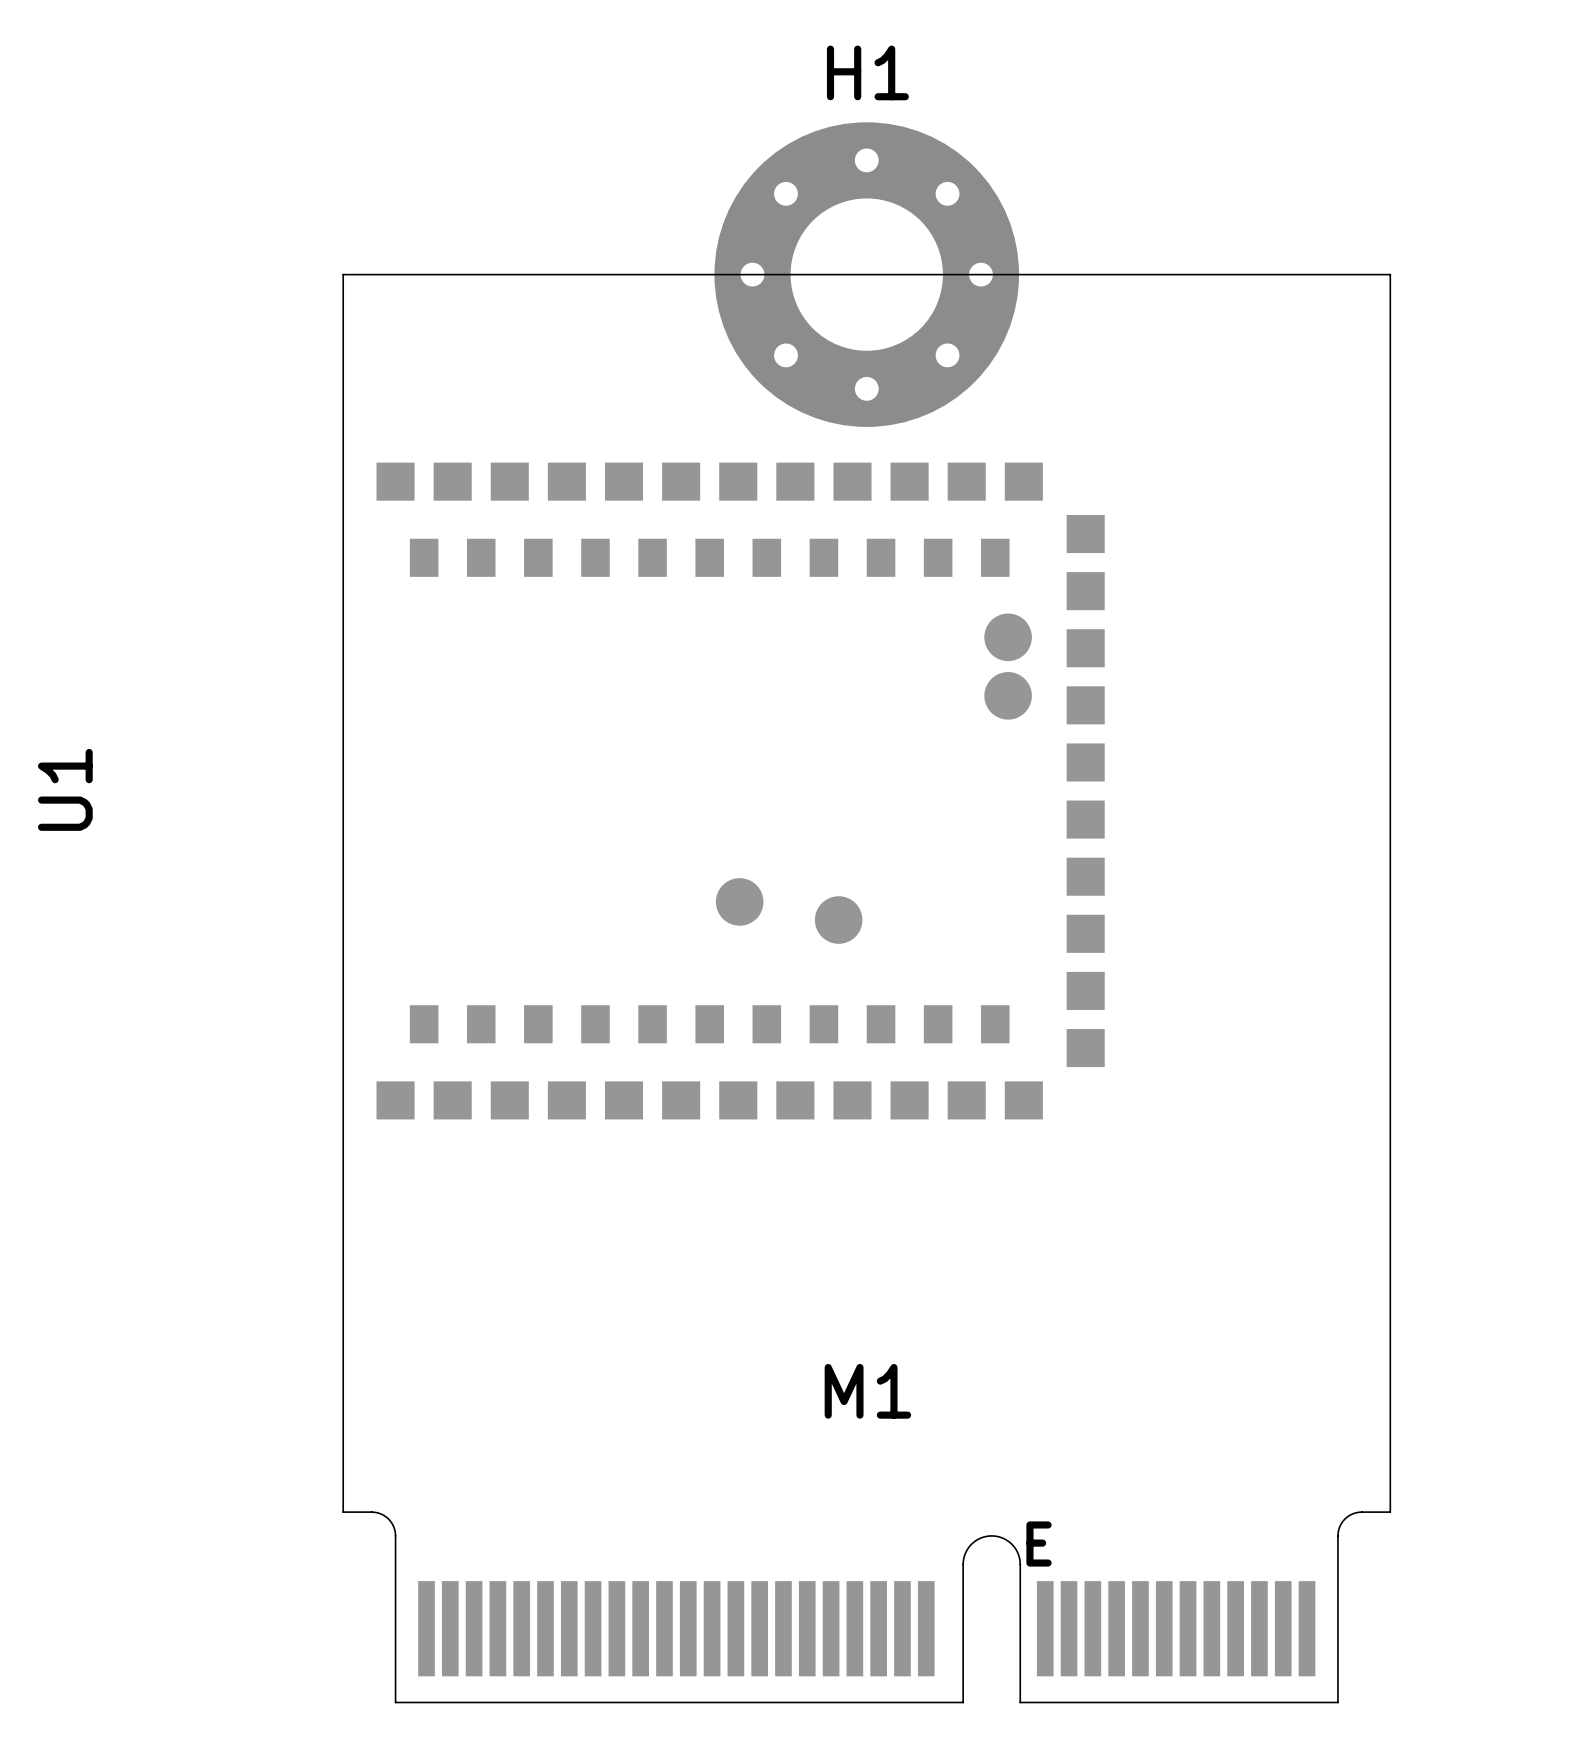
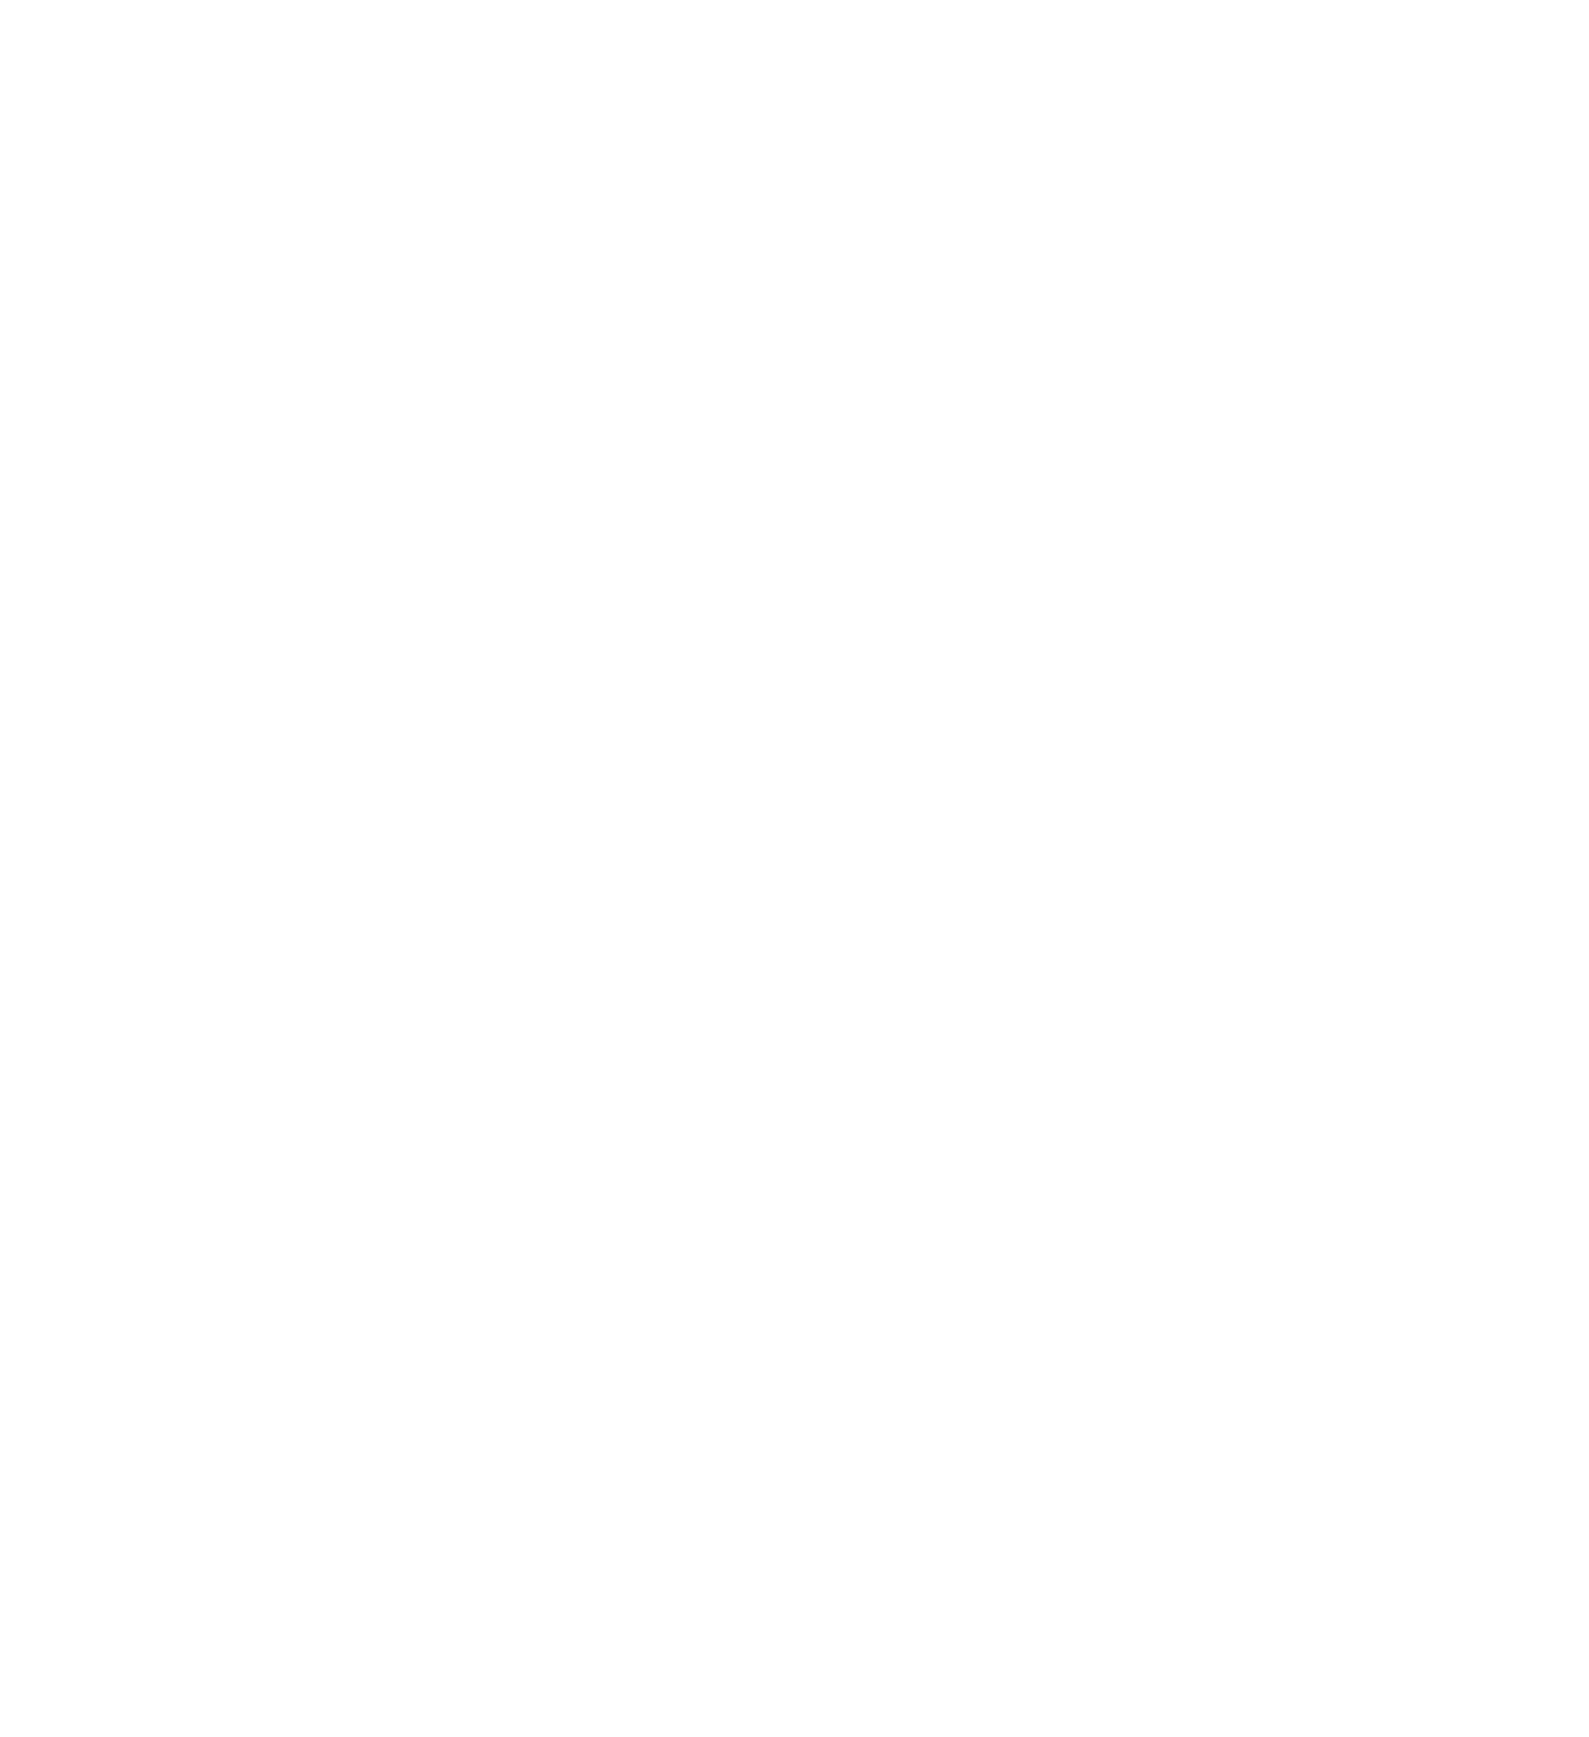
H1: (866, 274) -> none
U1: (740, 791) -> none
board edge: (343, 1512) (343, 274) (1390, 274) (1390, 1512) -> none
M1: (866, 1607) -> none

